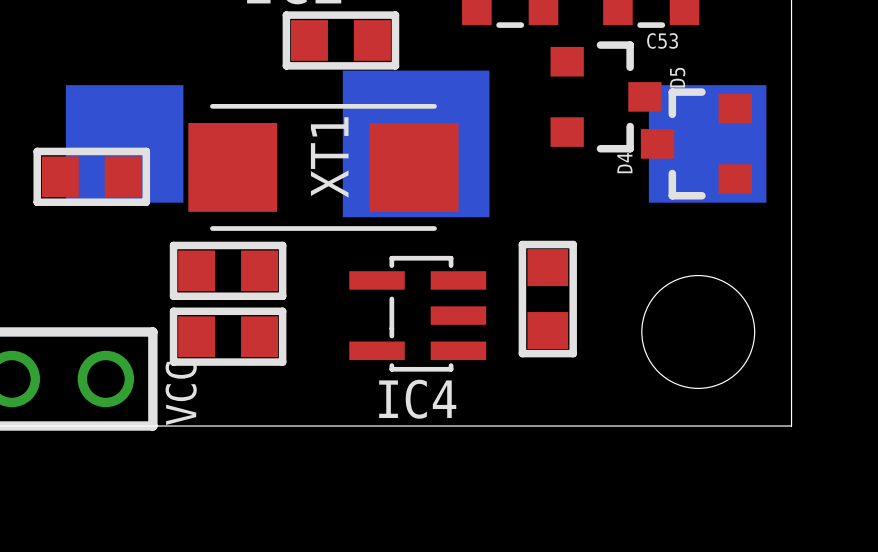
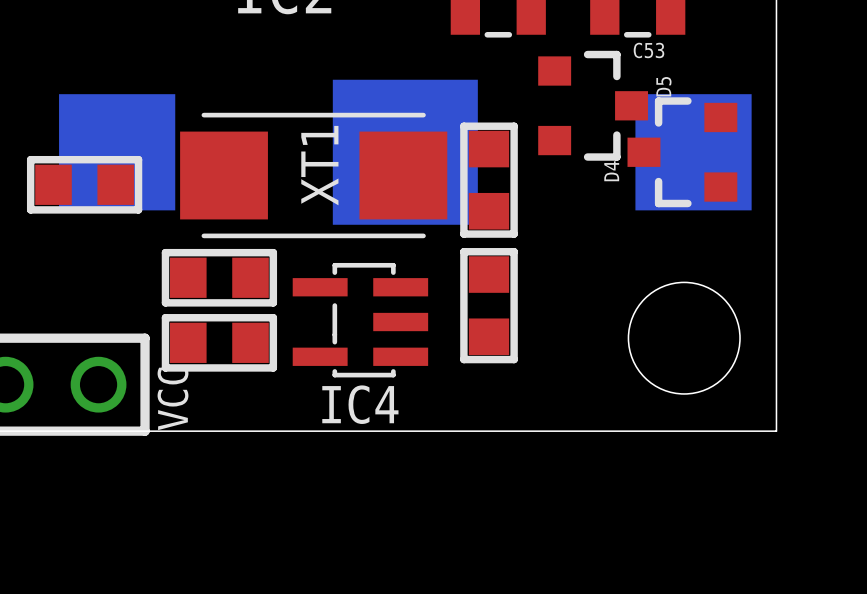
part: (340, 40) -> none
part: none -> (489, 180)
part position: (547, 299) -> (489, 305)
IC4 position: (417, 313) -> (360, 320)

